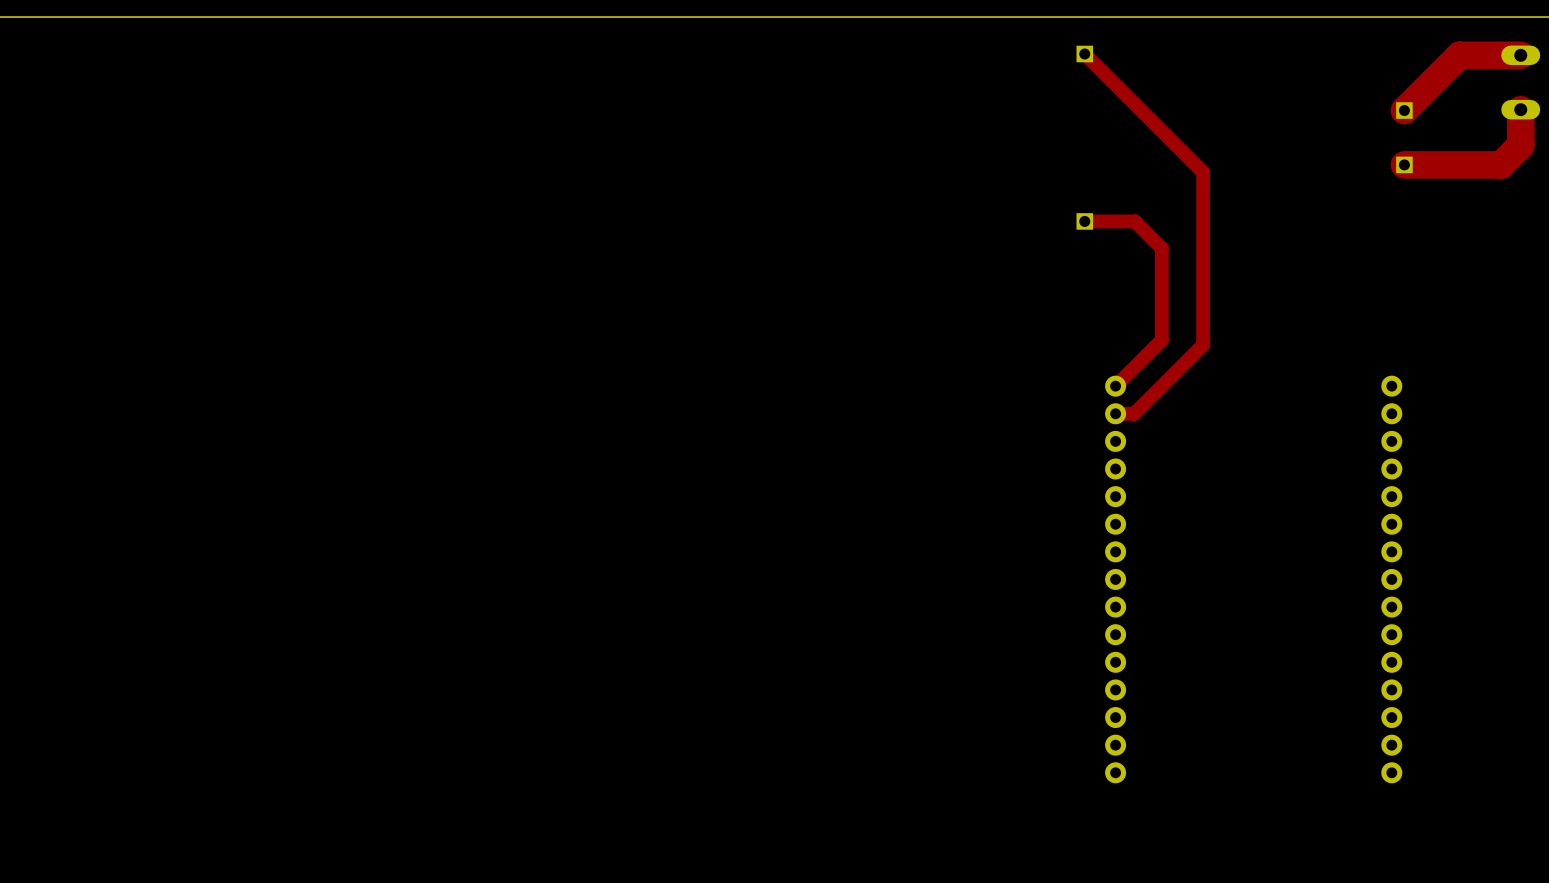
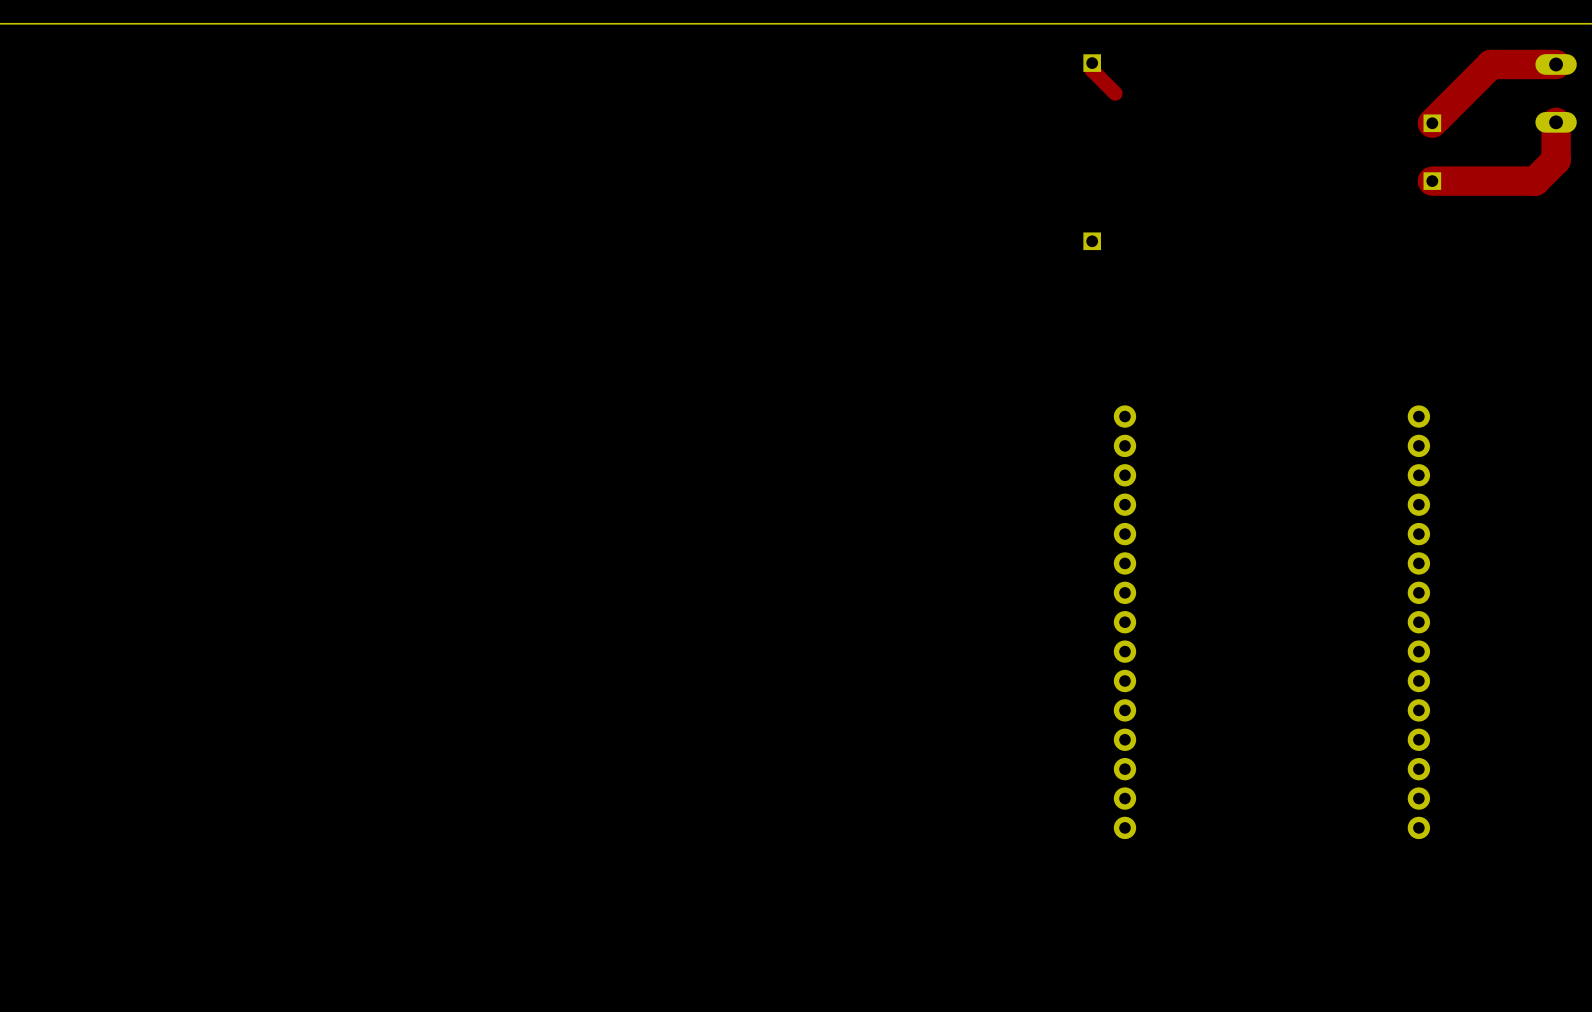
top track: (1084, 54) (1203, 172) (1203, 344) (1134, 413) (1115, 413) -> (1092, 63) (1092, 70) (1115, 93)
top track: (1084, 221) (1135, 221) (1161, 248) (1161, 340) (1115, 386) -> none

